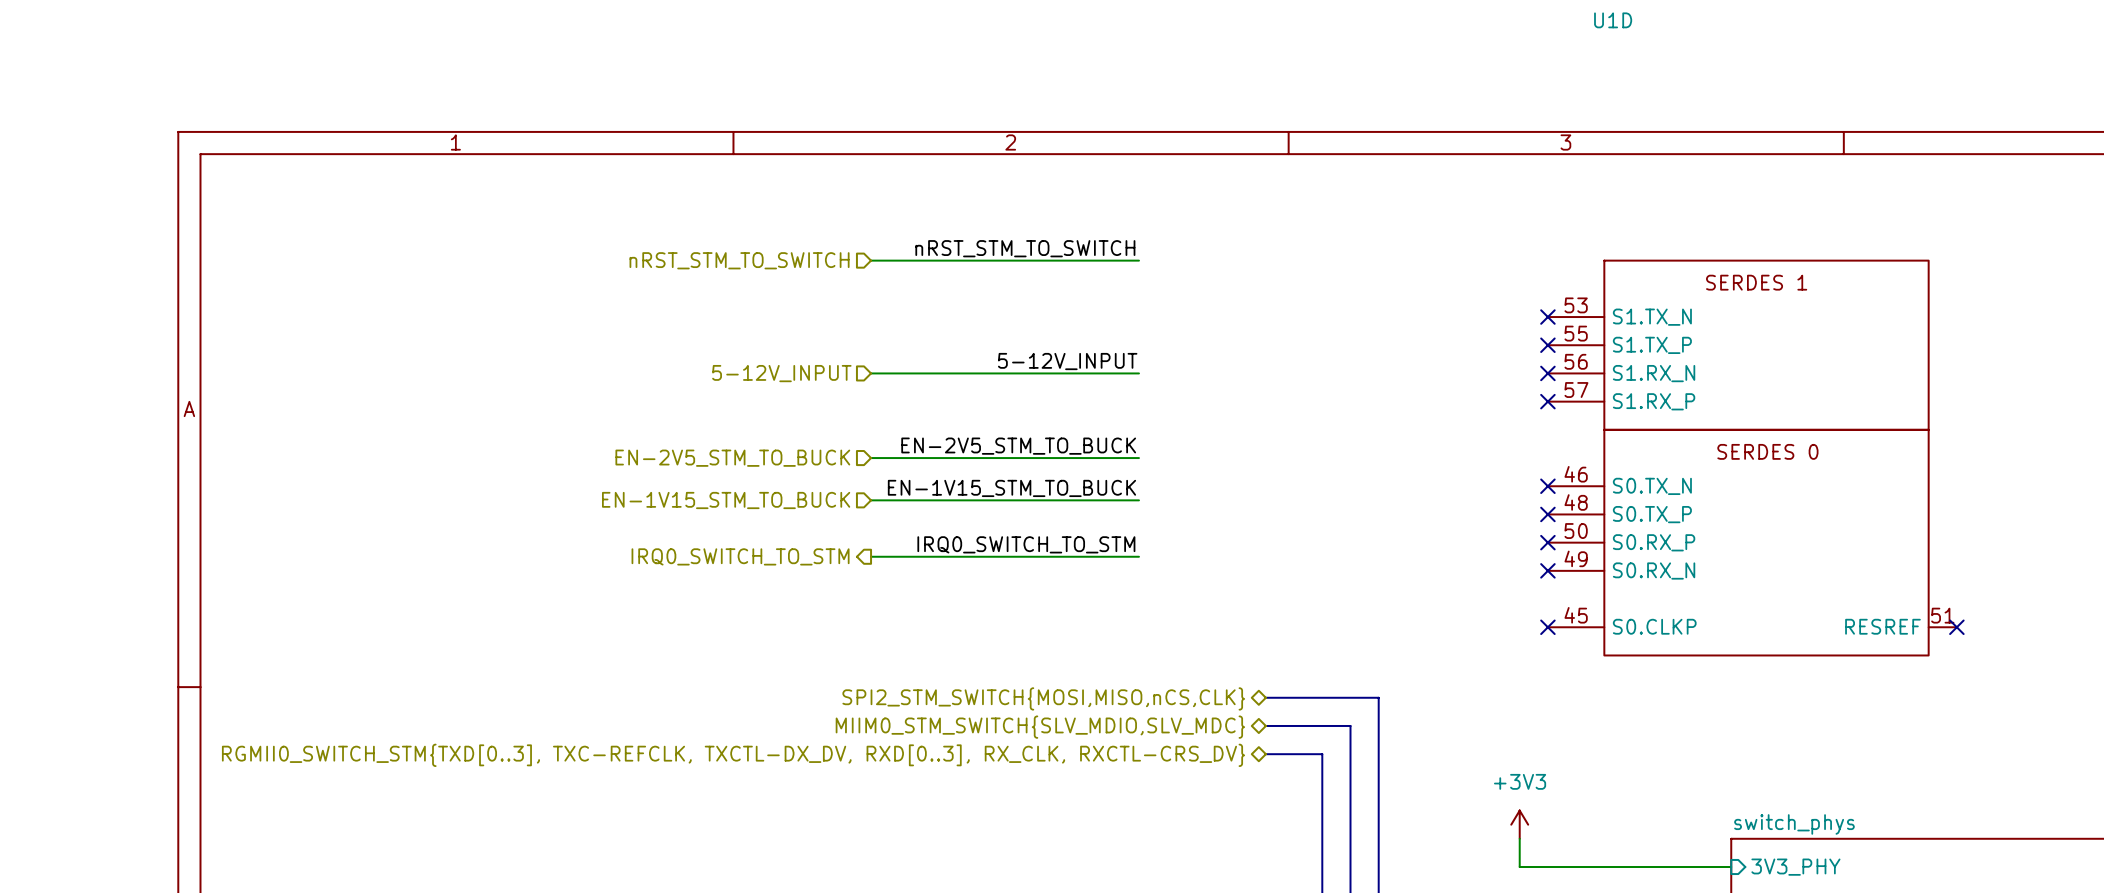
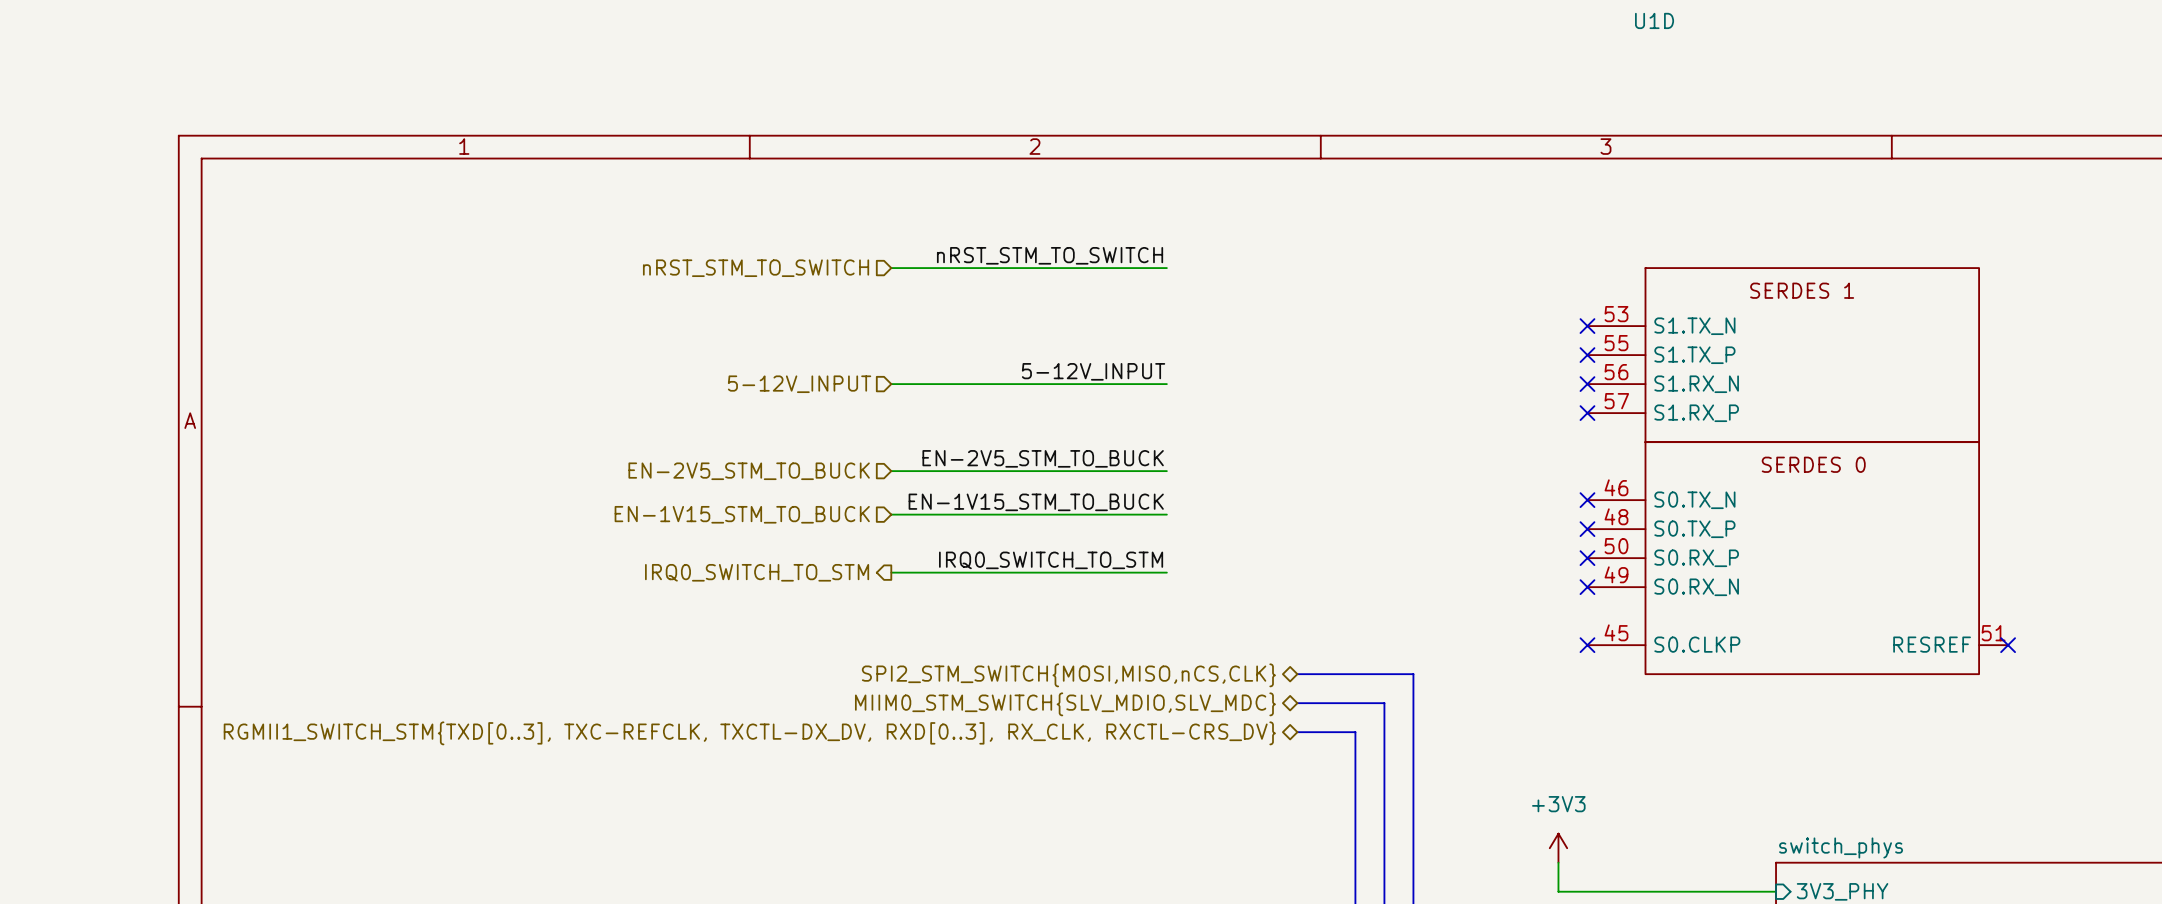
bus: (1265, 697) (1378, 697) -> (1297, 674) (1413, 674) (1413, 717)
hierarchical label position: SPI2_STM_SWITCH{MOSI,MISO,nCS,CLK} (1043, 698) -> SPI2_STM_SWITCH{MOSI,MISO,nCS,CLK} (1068, 675)
hierarchical label: none -> RGMII1_SWITCH_STM{TXD[0..3], TXC-REFCLK, TXCTL-DX_DV, RXD[0..3], RX_CLK, RXCTL-CRS_DV} (749, 733)
bus: (1265, 725) (1350, 725) -> (1297, 703) (1384, 703) (1384, 746)
hierarchical label position: MIIM0_STM_SWITCH{SLV_MDIO,SLV_MDC} (1040, 727) -> MIIM0_STM_SWITCH{SLV_MDIO,SLV_MDC} (1065, 704)
bus: (1265, 754) (1322, 754) -> (1297, 732) (1355, 732) (1355, 775)
hierarchical label: RGMII0_SWITCH_STM{TXD[0..3], TXC-REFCLK, TXCTL-DX_DV, RXD[0..3], RX_CLK, RXCTL-CRS_DV} (733, 755) -> none

